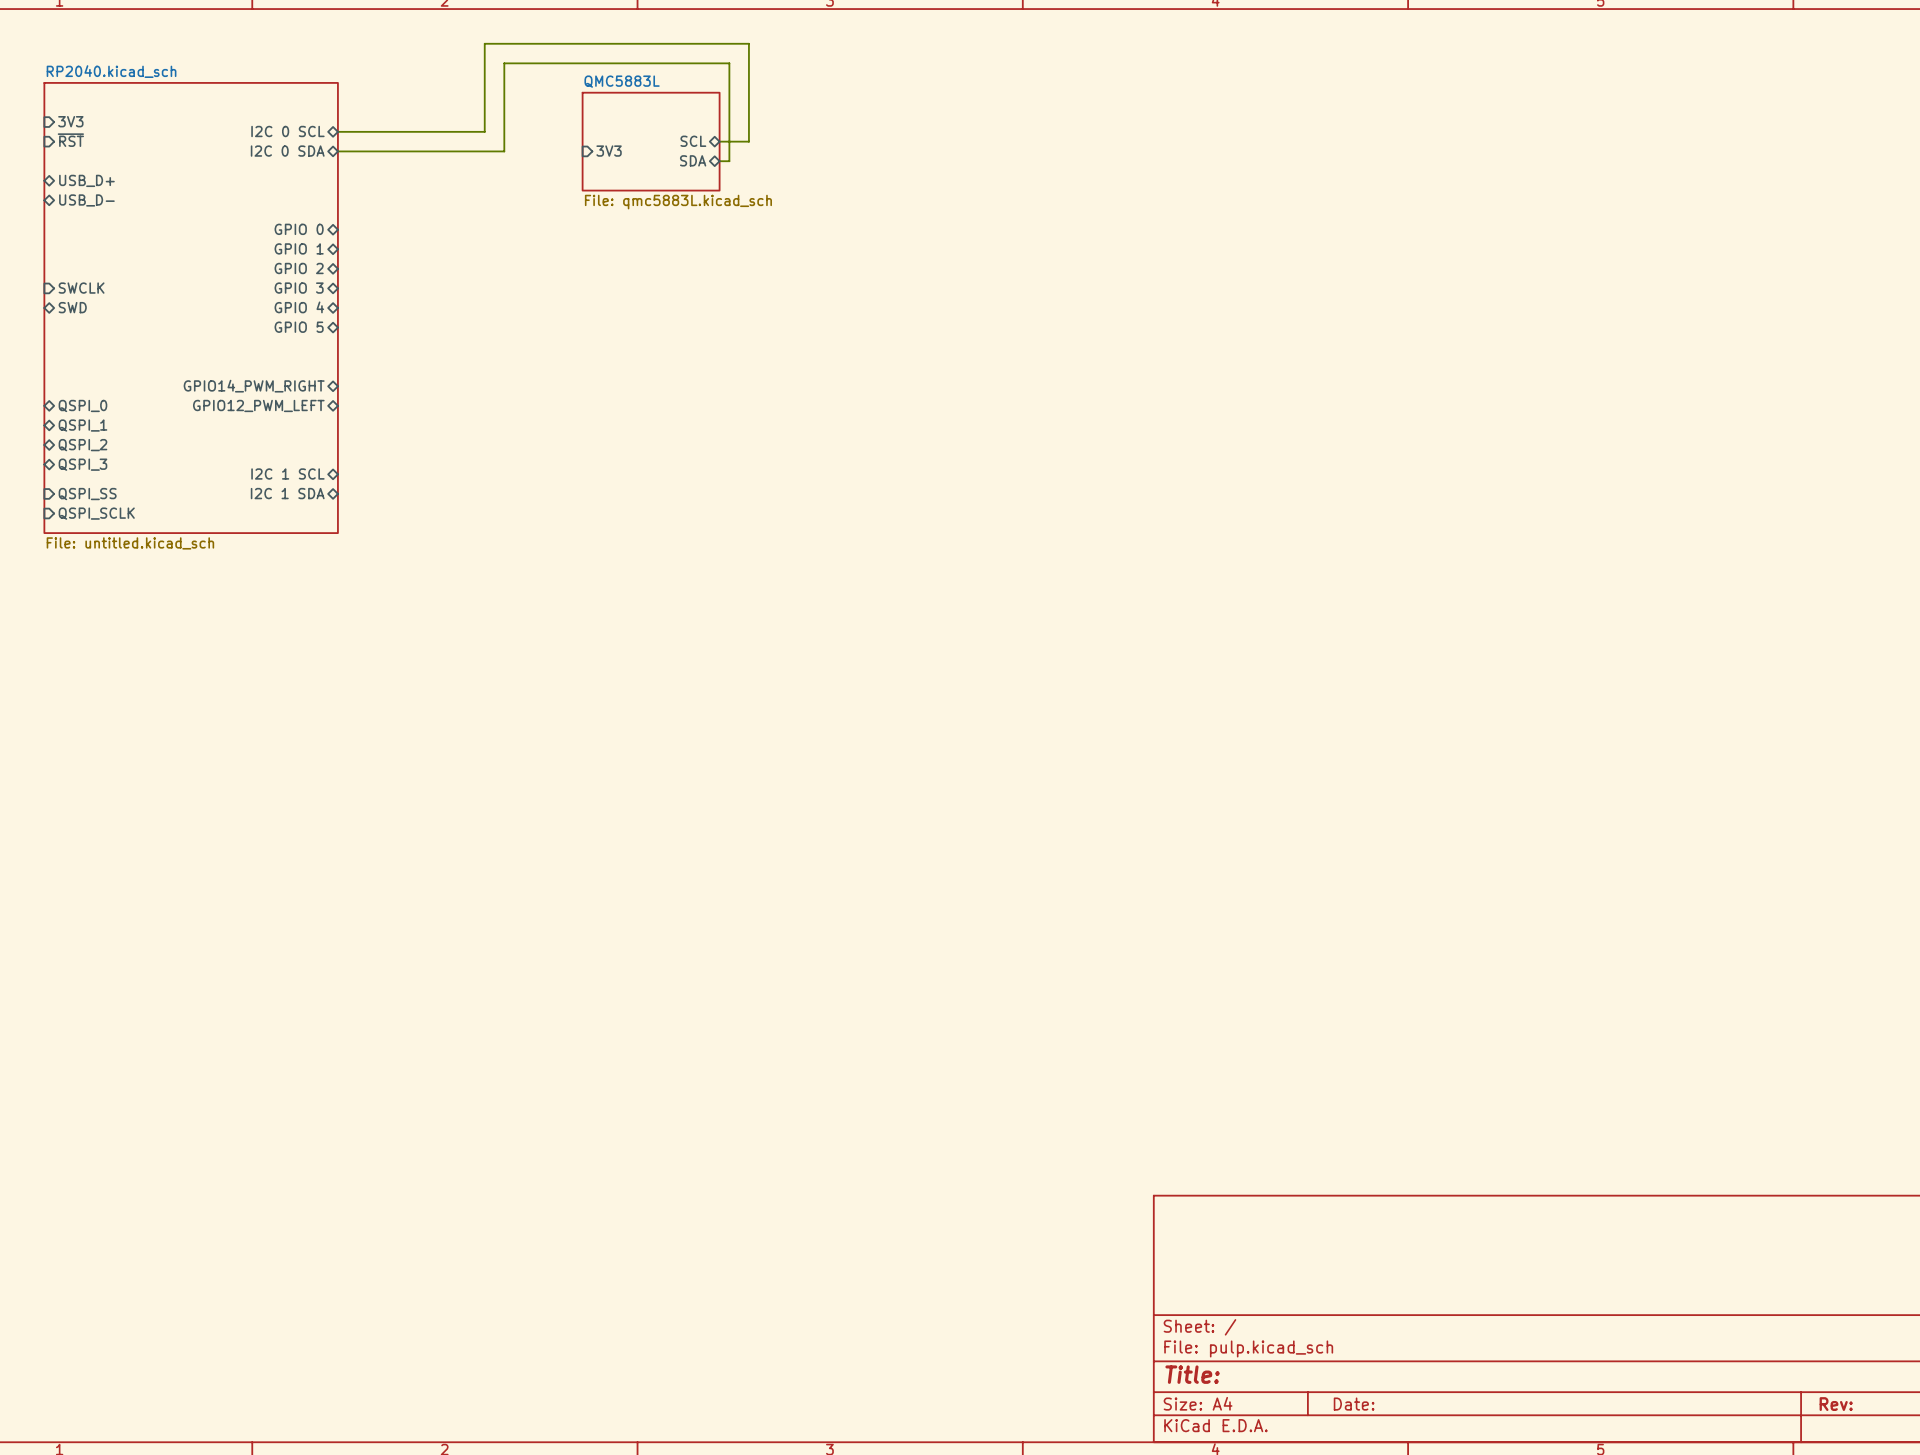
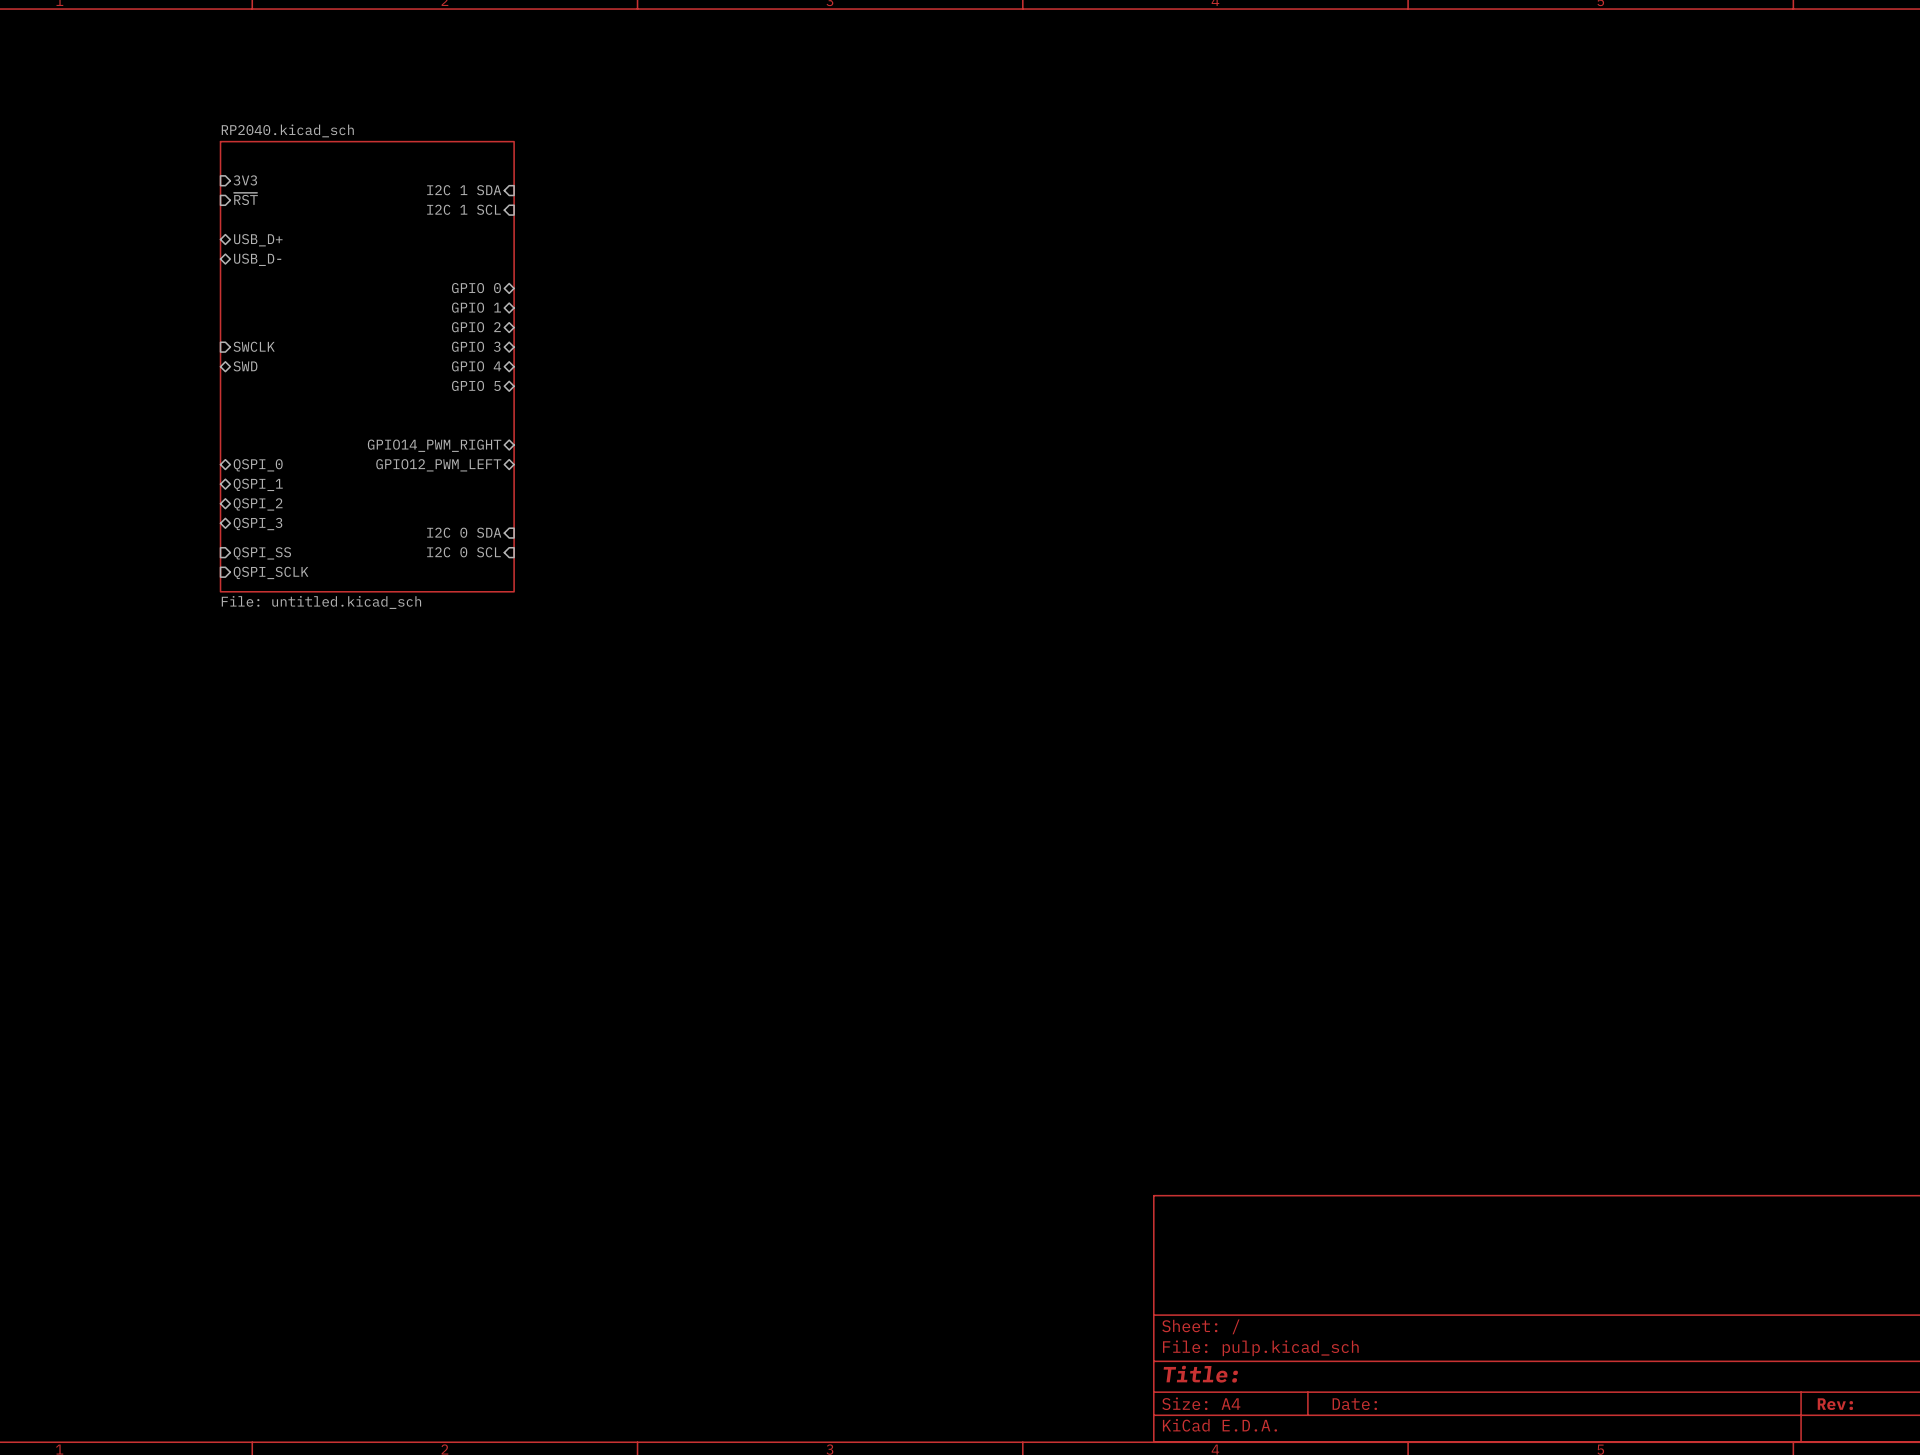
sheet pin: 3V3 (70, 121) -> none
sheet pin: I2C 0 SCL (287, 131) -> none
wire: (337, 131) (484, 131) (484, 43) (748, 43) (748, 141) (719, 141) -> none
sheet pin position: ~{RST} (70, 140) -> ~{RST} (245, 198)
sheet QMC5883L: File: qmc5883L.kicad_sch (651, 141) -> none
sheet pin: SCL (693, 141) -> none
sheet pin: I2C 0 SDA (287, 151) -> none
wire: (337, 151) (504, 151) (504, 63) (729, 63) (729, 161) (719, 161) -> none
sheet pin: 3V3 (609, 151) -> none
sheet pin: SDA (693, 160) -> none
sheet pin position: USB_D+ (86, 180) -> USB_D+ (258, 240)
sheet pin: none -> 3V3 (245, 180)
sheet pin: none -> I2C 1 SDA (464, 190)
sheet pin position: USB_D- (86, 200) -> USB_D- (257, 259)
sheet pin: none -> I2C 1 SCL (463, 209)
sheet pin position: GPIO 0 (299, 229) -> GPIO 0 (476, 288)
sheet pin position: GPIO 1 (299, 248) -> GPIO 1 (476, 307)
sheet pin position: GPIO 2 (299, 268) -> GPIO 2 (476, 327)
sheet pin position: SWCLK (81, 288) -> SWCLK (254, 346)
sheet pin position: GPIO 3 (299, 288) -> GPIO 3 (476, 346)
sheet pin position: SWD (72, 307) -> SWD (245, 366)
sheet pin position: GPIO 4 (299, 307) -> GPIO 4 (476, 366)
sheet RP2040.kicad_sch position: (191, 308) -> (367, 366)
sheet pin position: GPIO 5 (299, 327) -> GPIO 5 (476, 385)
sheet pin position: GPIO14_PWM_RIGHT (254, 386) -> GPIO14_PWM_RIGHT (434, 445)
sheet pin position: QSPI_0 (82, 405) -> QSPI_0 (258, 465)
sheet pin position: GPIO12_PWM_LEFT (258, 405) -> GPIO12_PWM_LEFT (438, 465)
sheet pin position: QSPI_1 (82, 425) -> QSPI_1 (258, 484)
sheet pin position: QSPI_2 (82, 445) -> QSPI_2 (258, 504)
sheet pin position: QSPI_3 (82, 464) -> QSPI_3 (258, 524)
sheet pin: I2C 1 SCL (287, 474) -> none
sheet pin: I2C 1 SDA (287, 493) -> none
sheet pin position: QSPI_SS (87, 494) -> QSPI_SS (262, 553)
sheet pin position: QSPI_SCLK (96, 513) -> QSPI_SCLK (271, 572)
sheet pin: none -> I2C 0 SDA (464, 532)
sheet pin: none -> I2C 0 SCL (463, 552)

